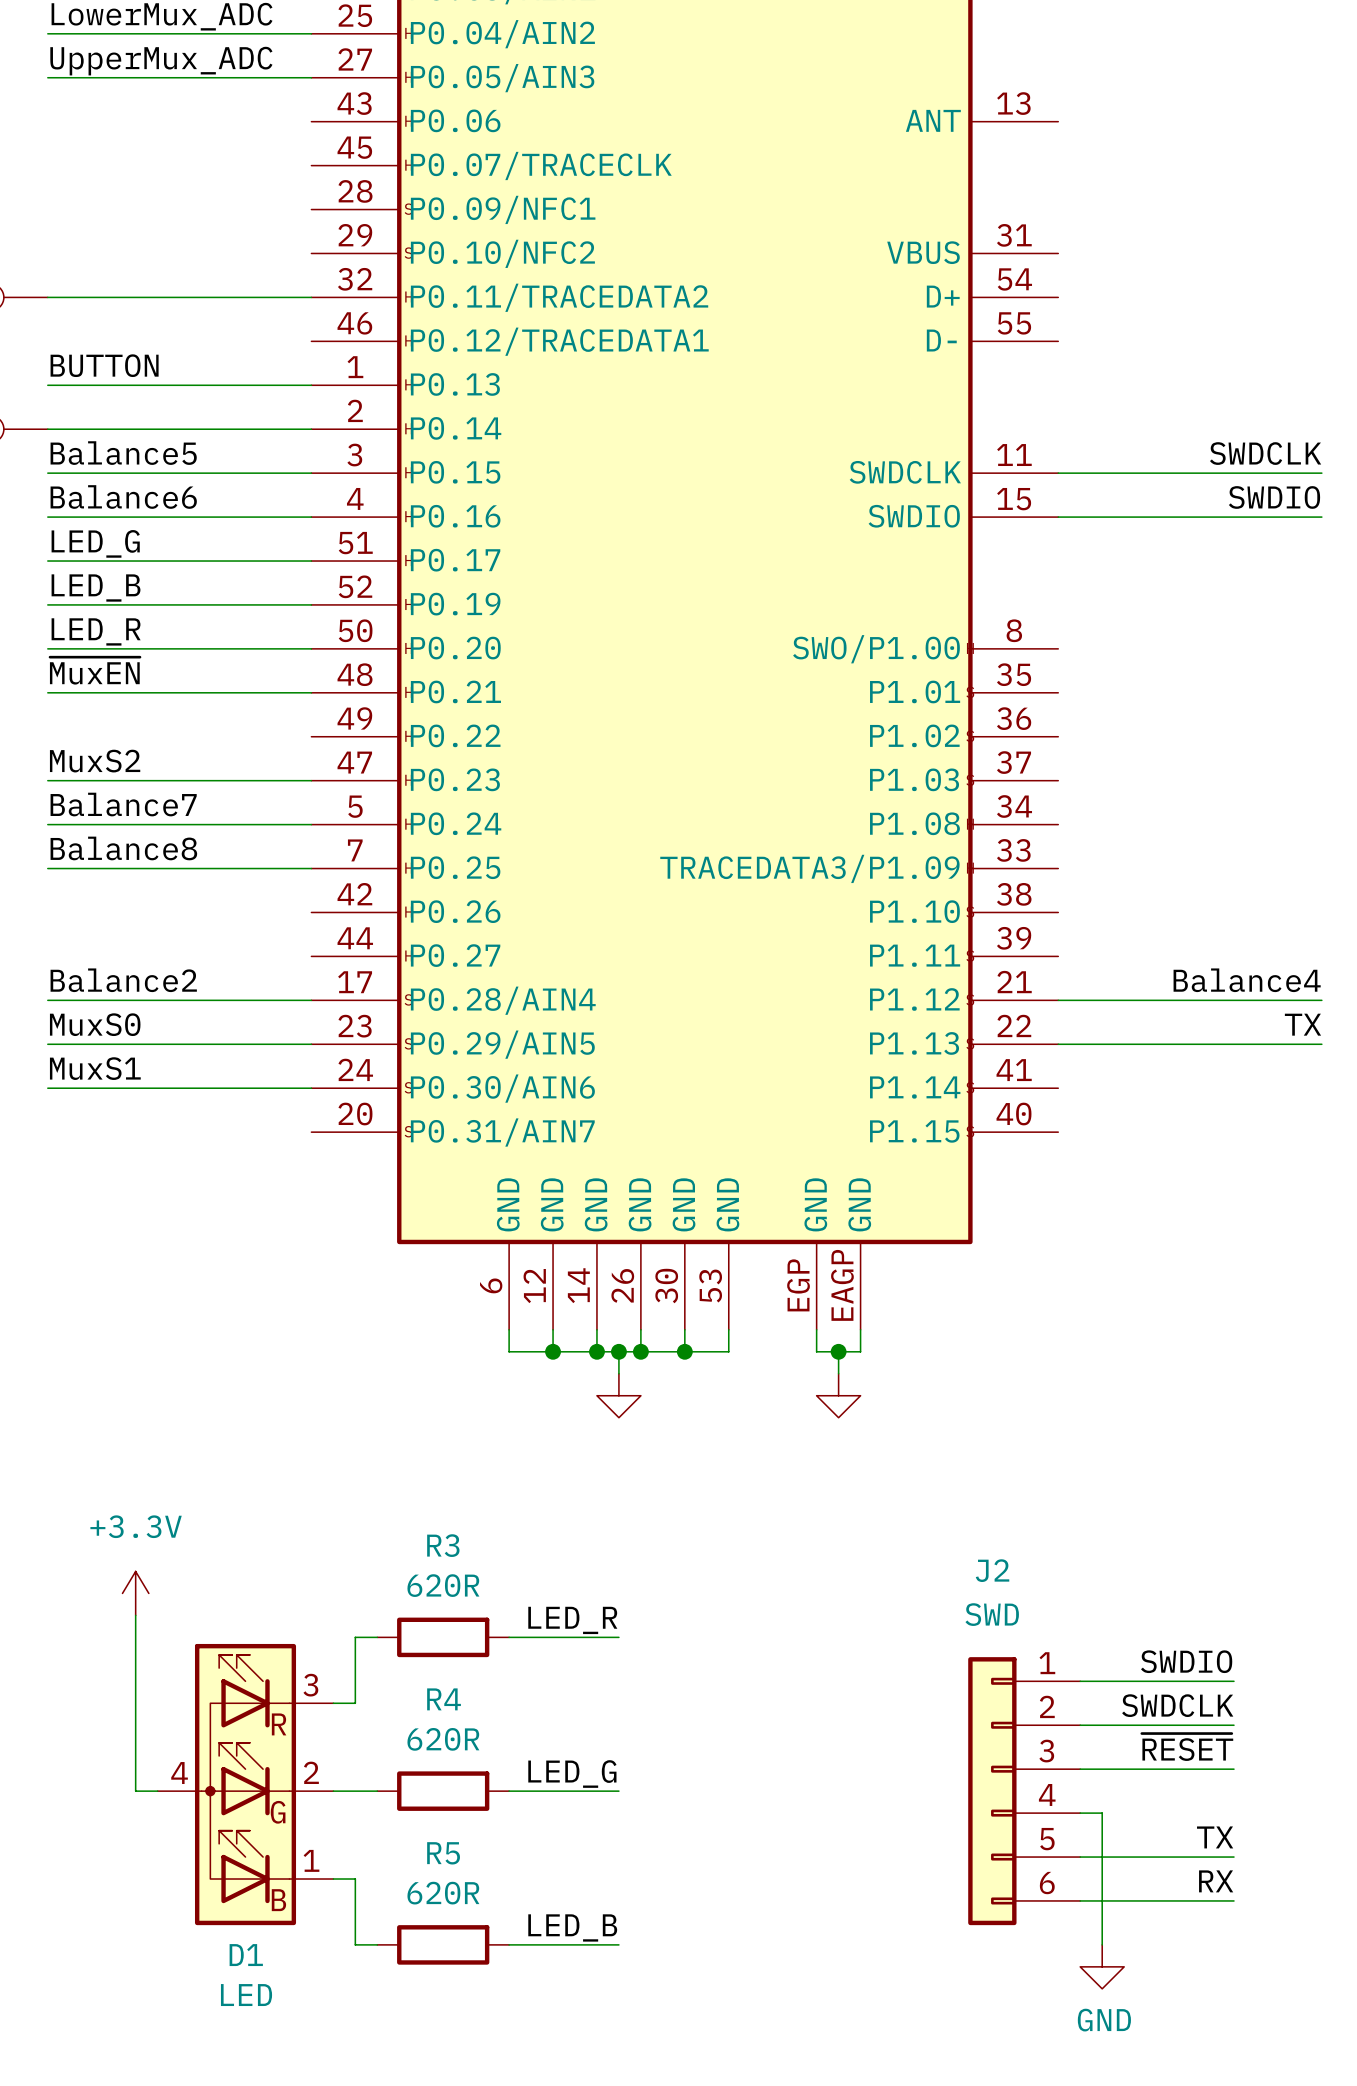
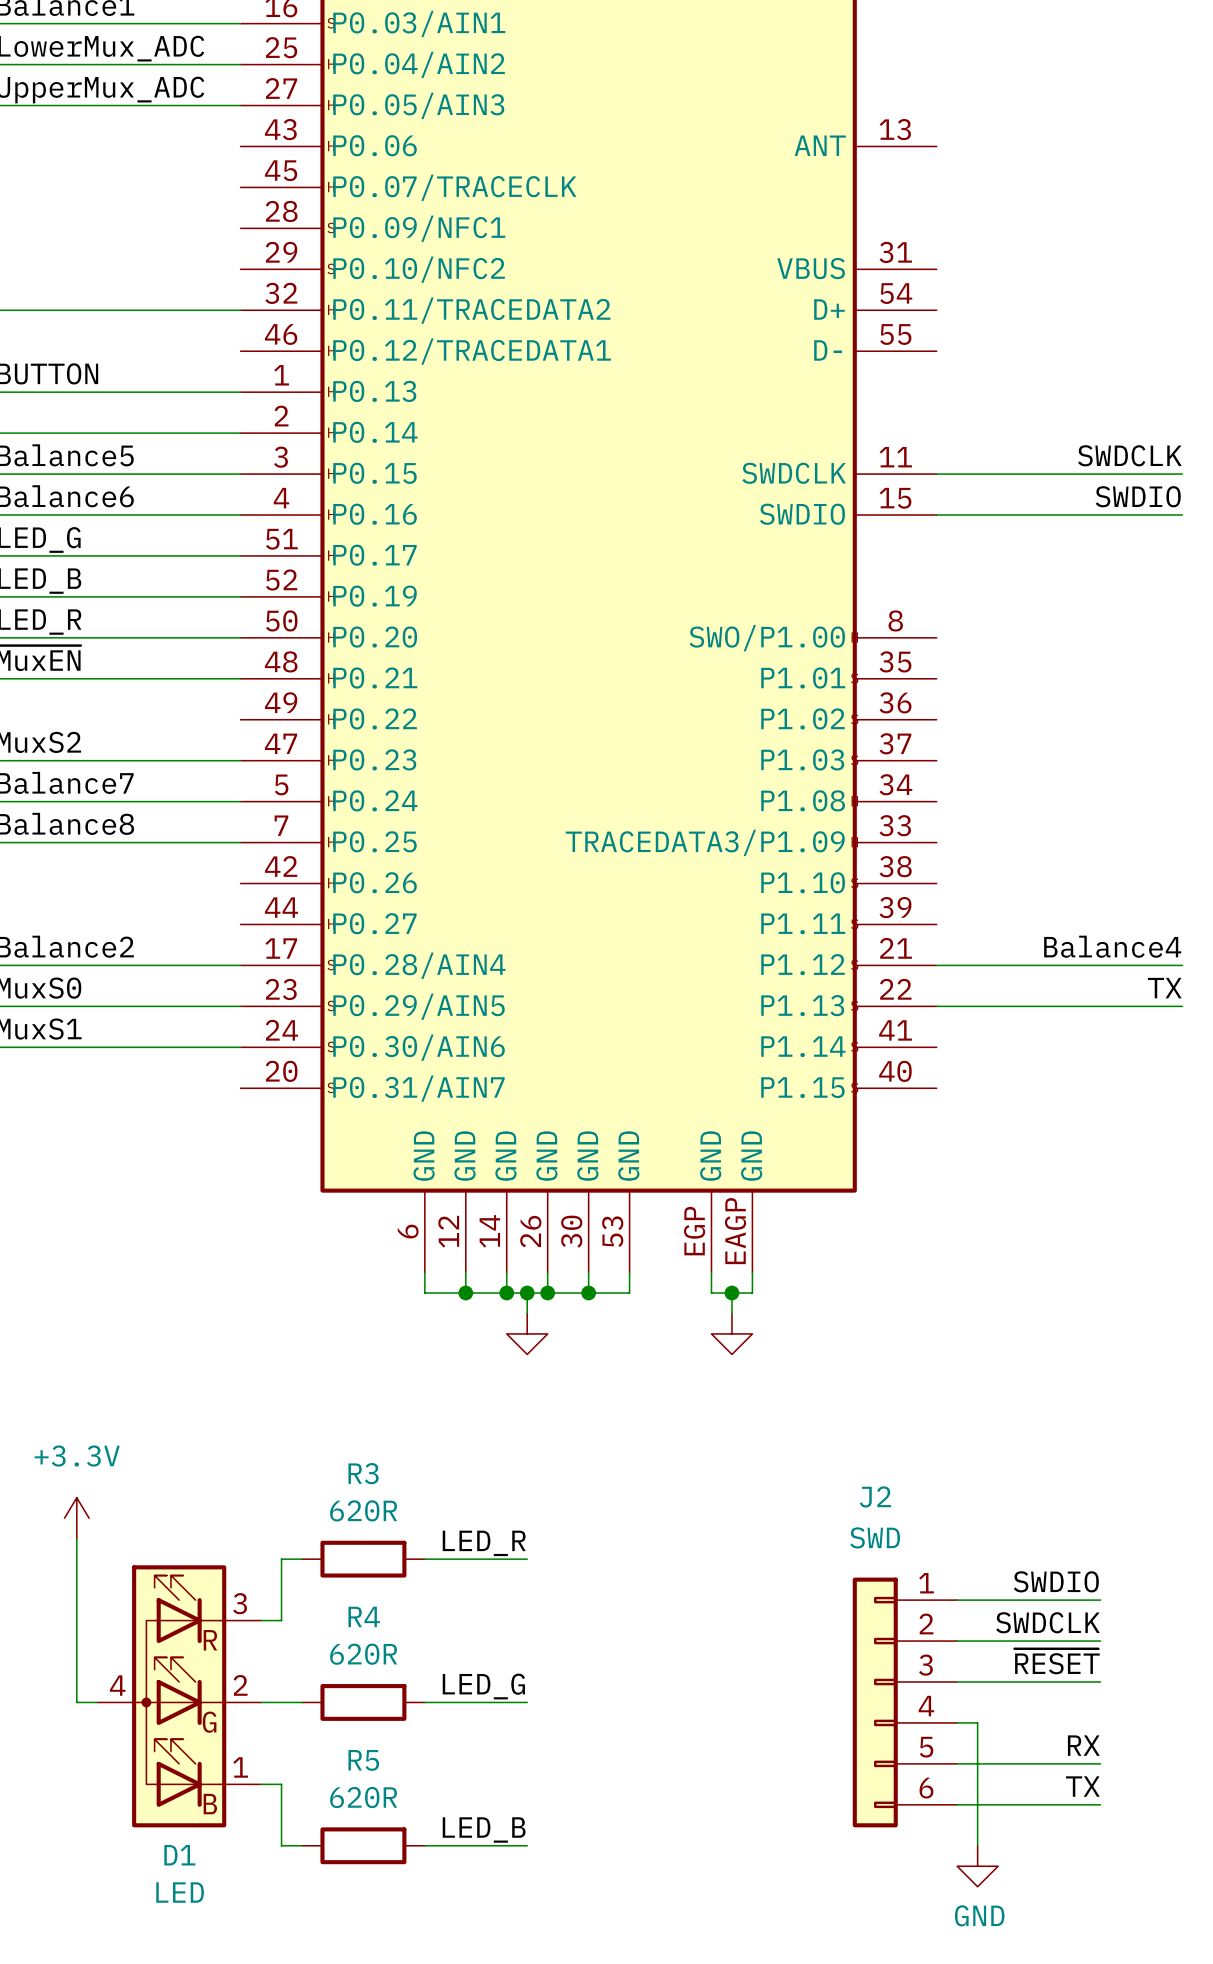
label: TX (1215, 1837) -> RX (1083, 1745)
label: RX (1216, 1881) -> TX (1082, 1786)

